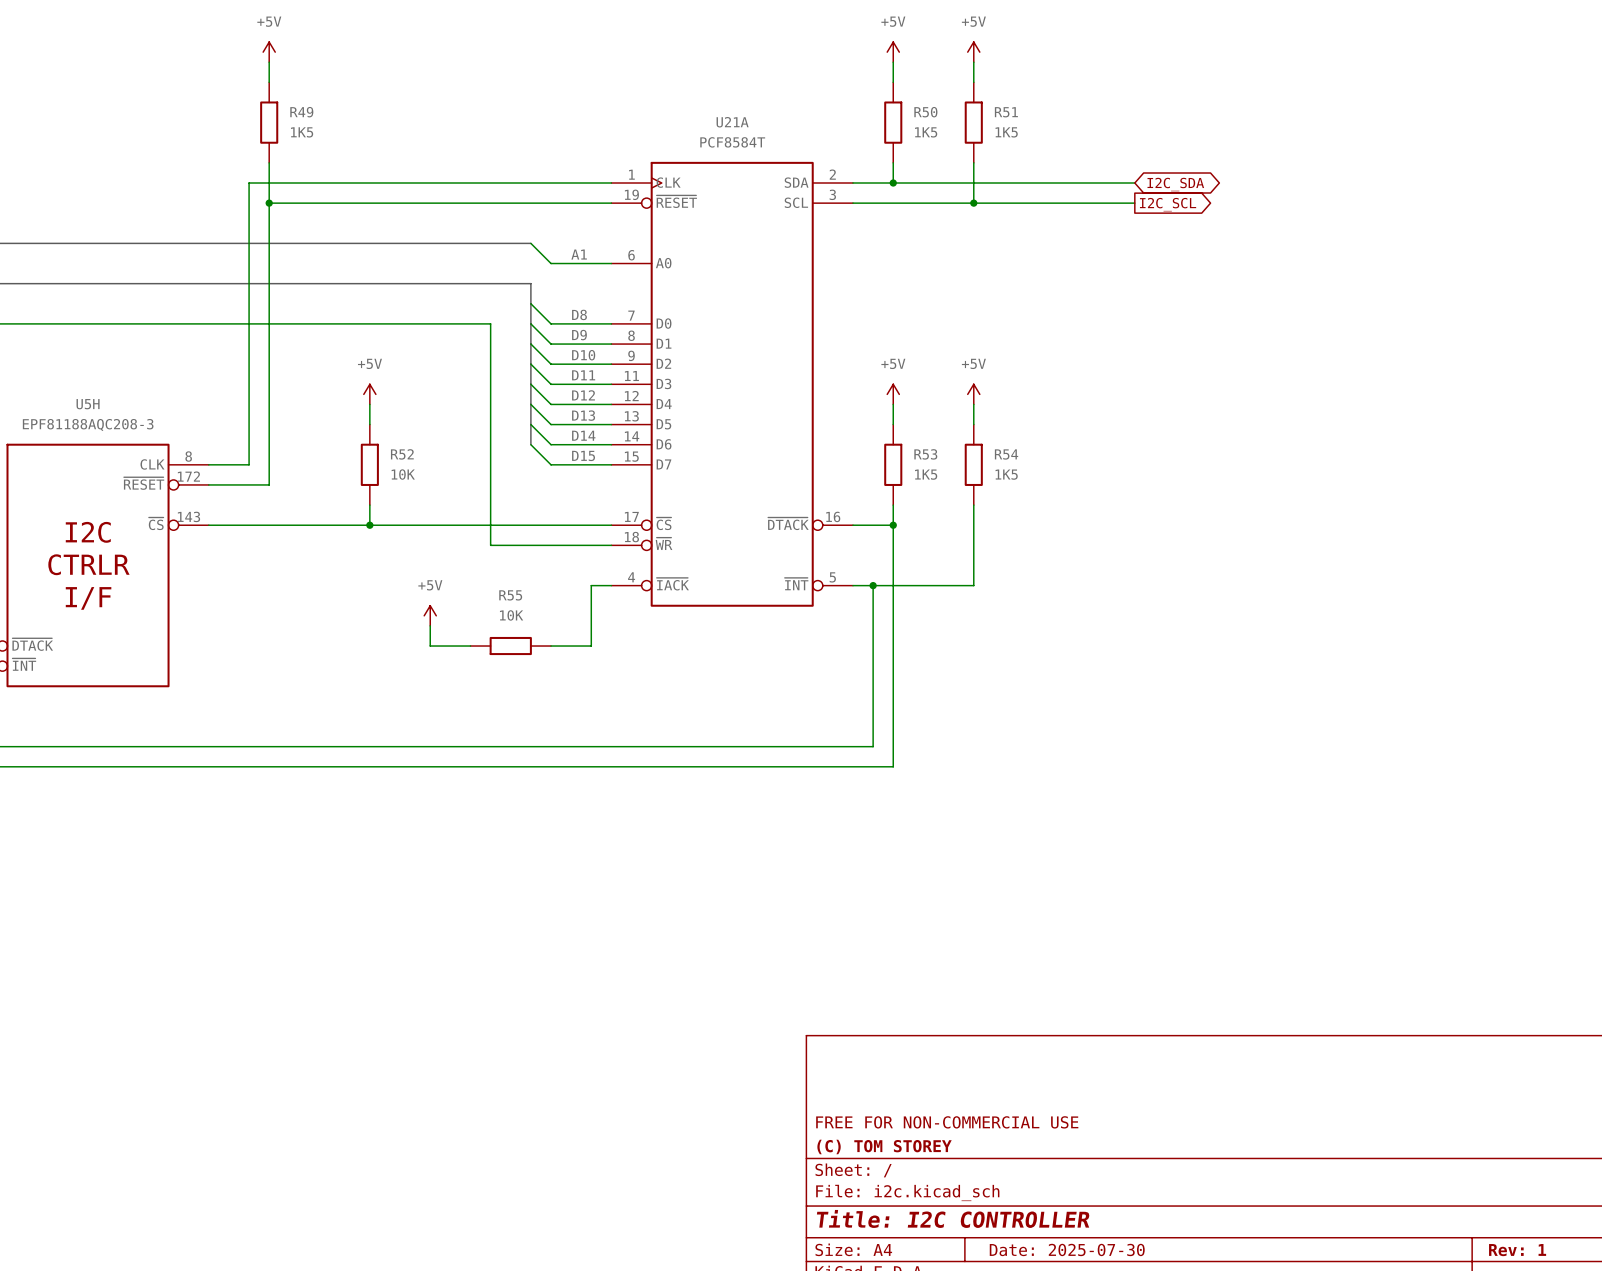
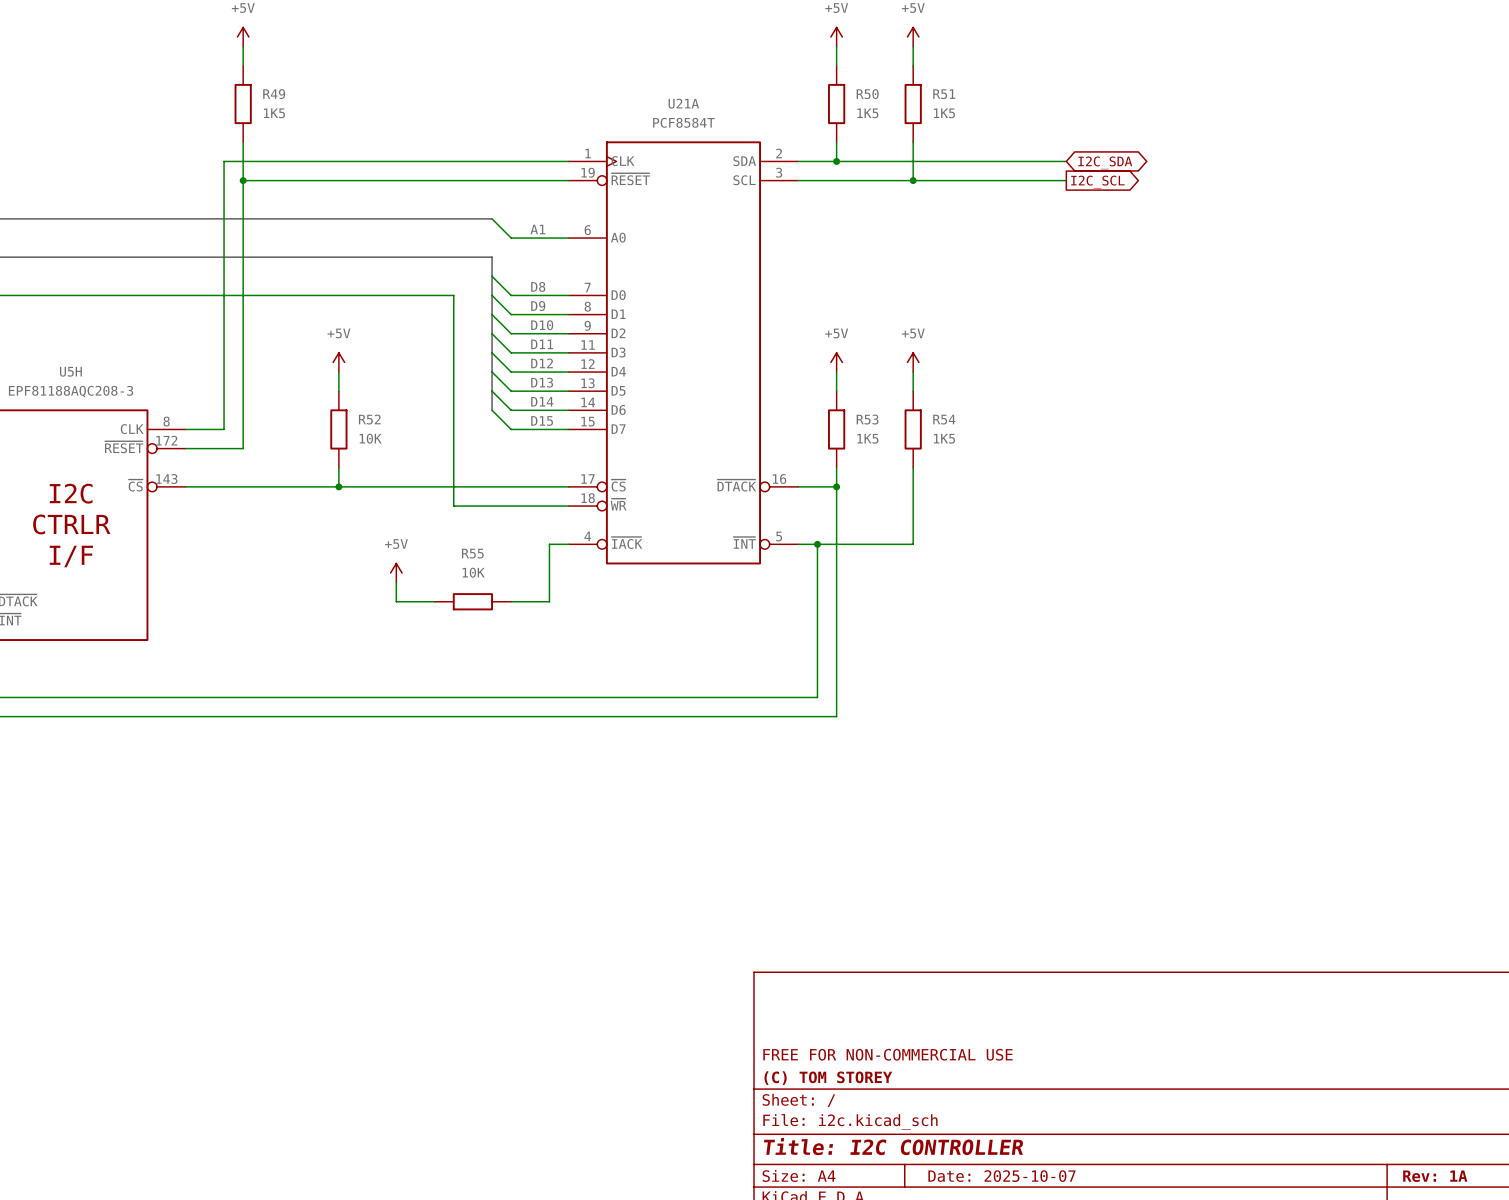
title block: Date: 2025-07-30 (1067, 1249) -> Date: 2025-10-07 (1001, 1176)
title block: Rev: 1 (1517, 1250) -> Rev: 1A (1435, 1176)

